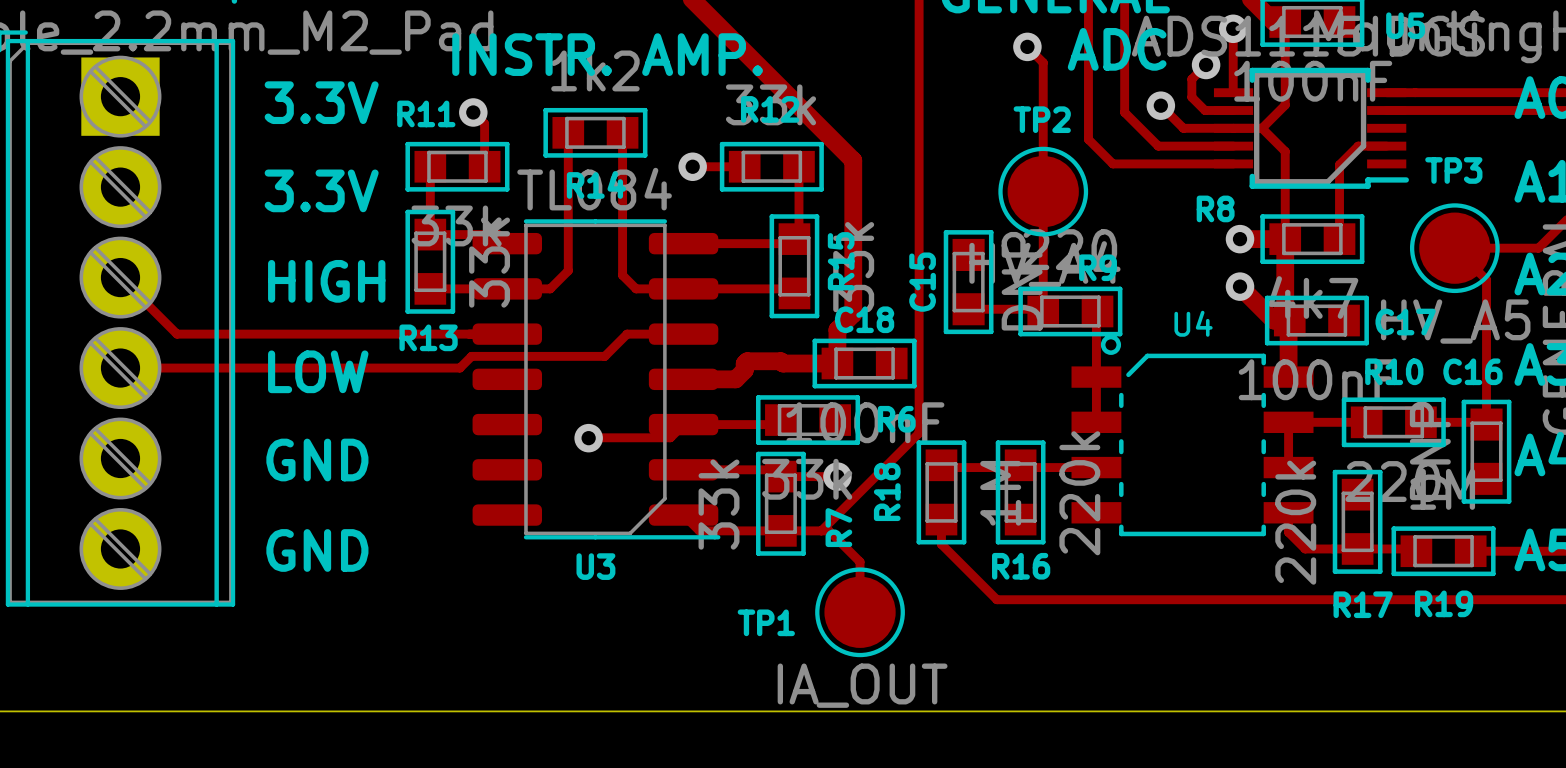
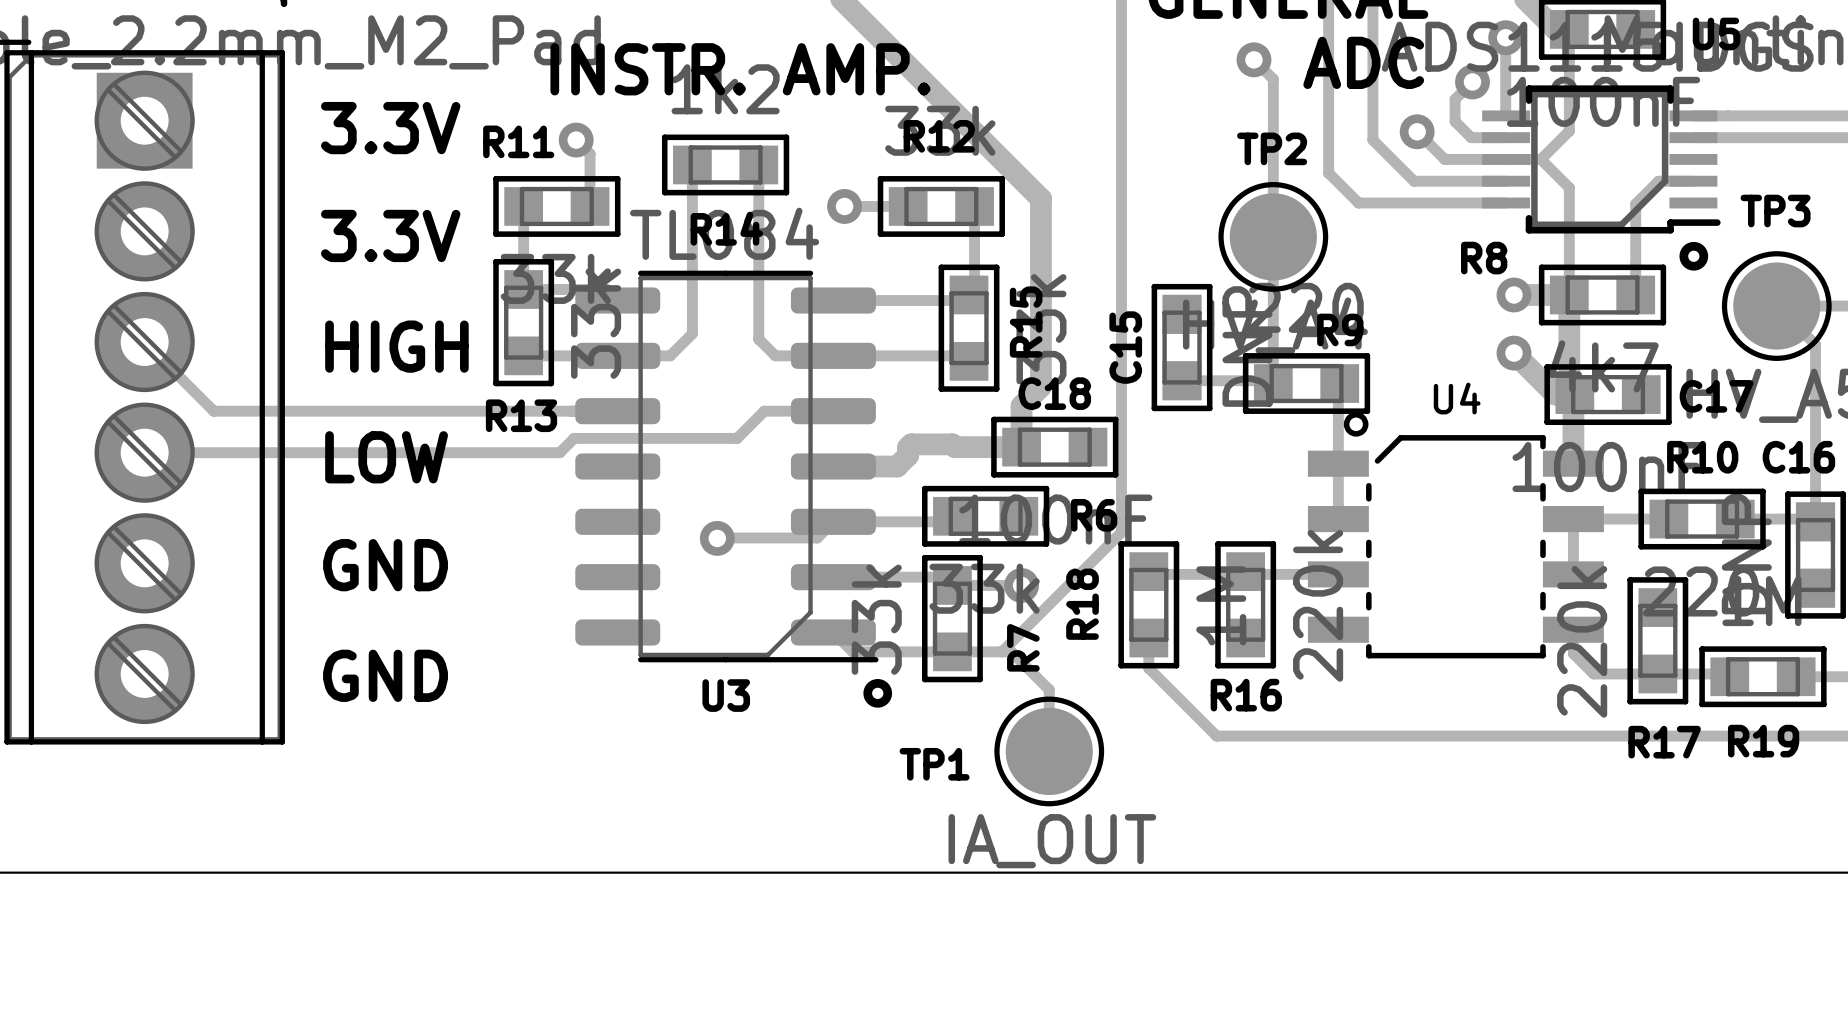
drawing: none -> [1679, 241, 1709, 271]
drawing: none -> [863, 679, 893, 708]

